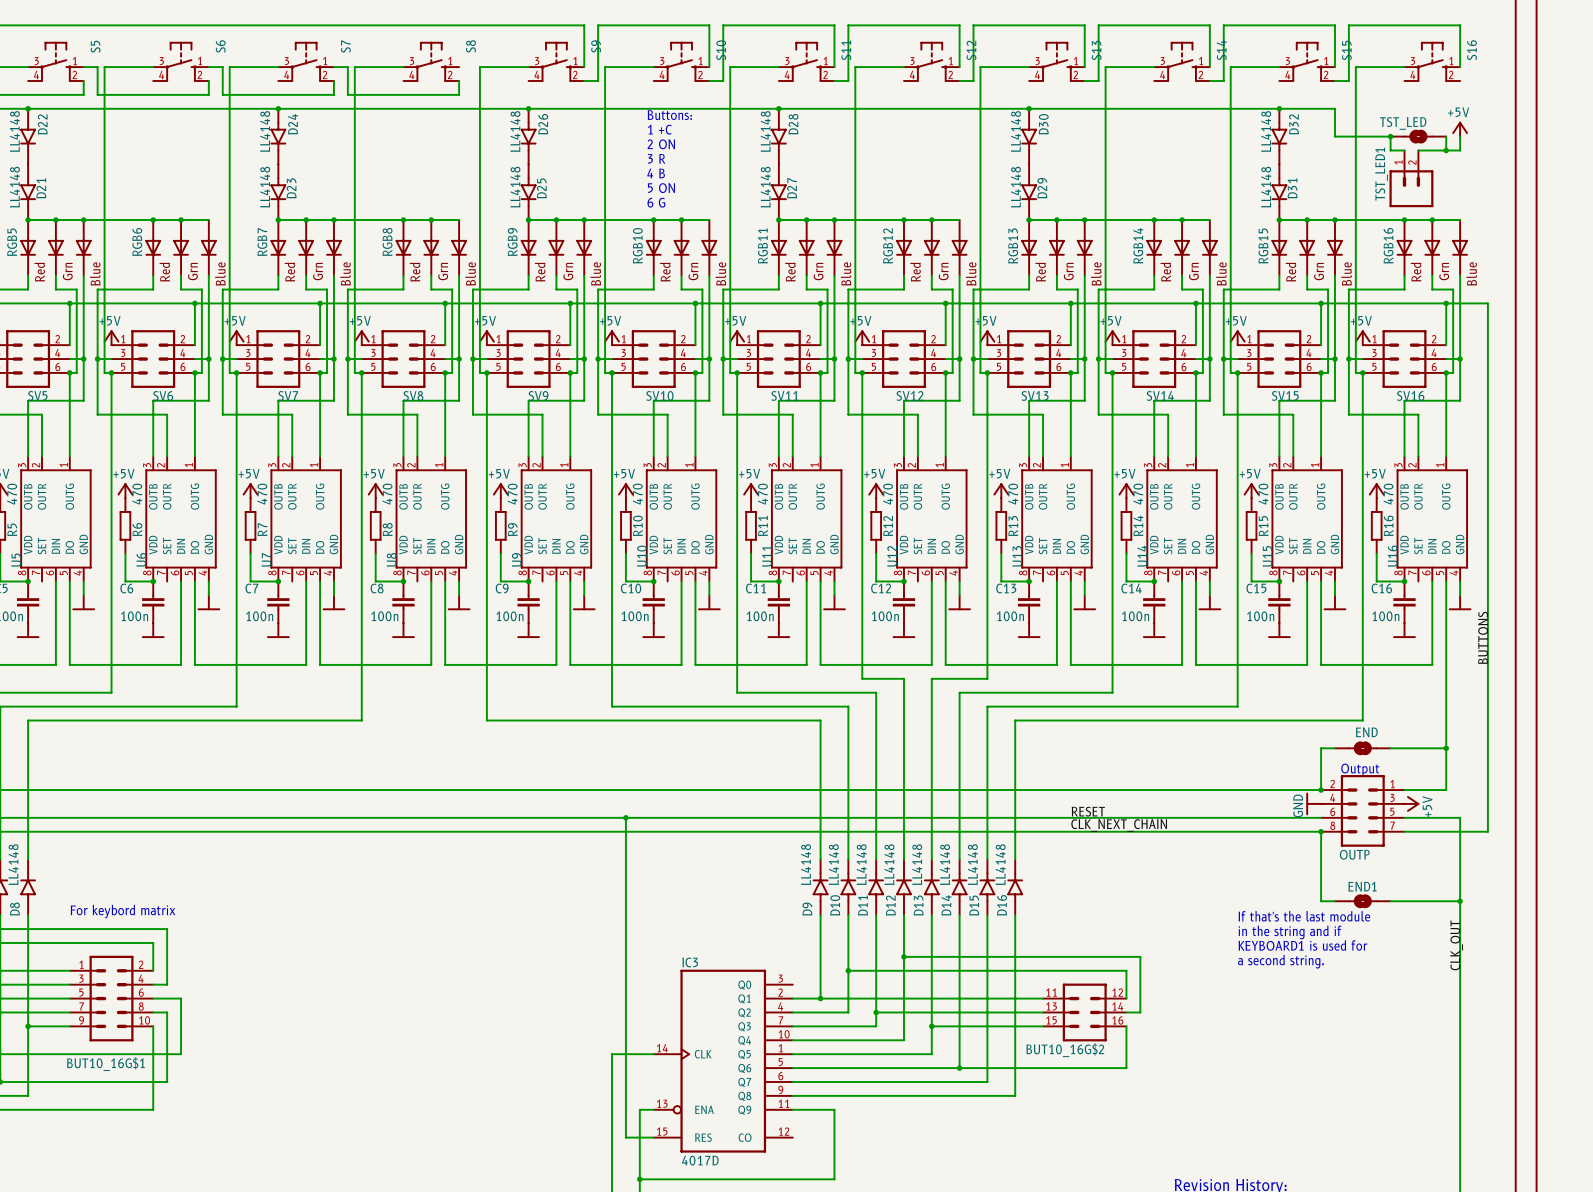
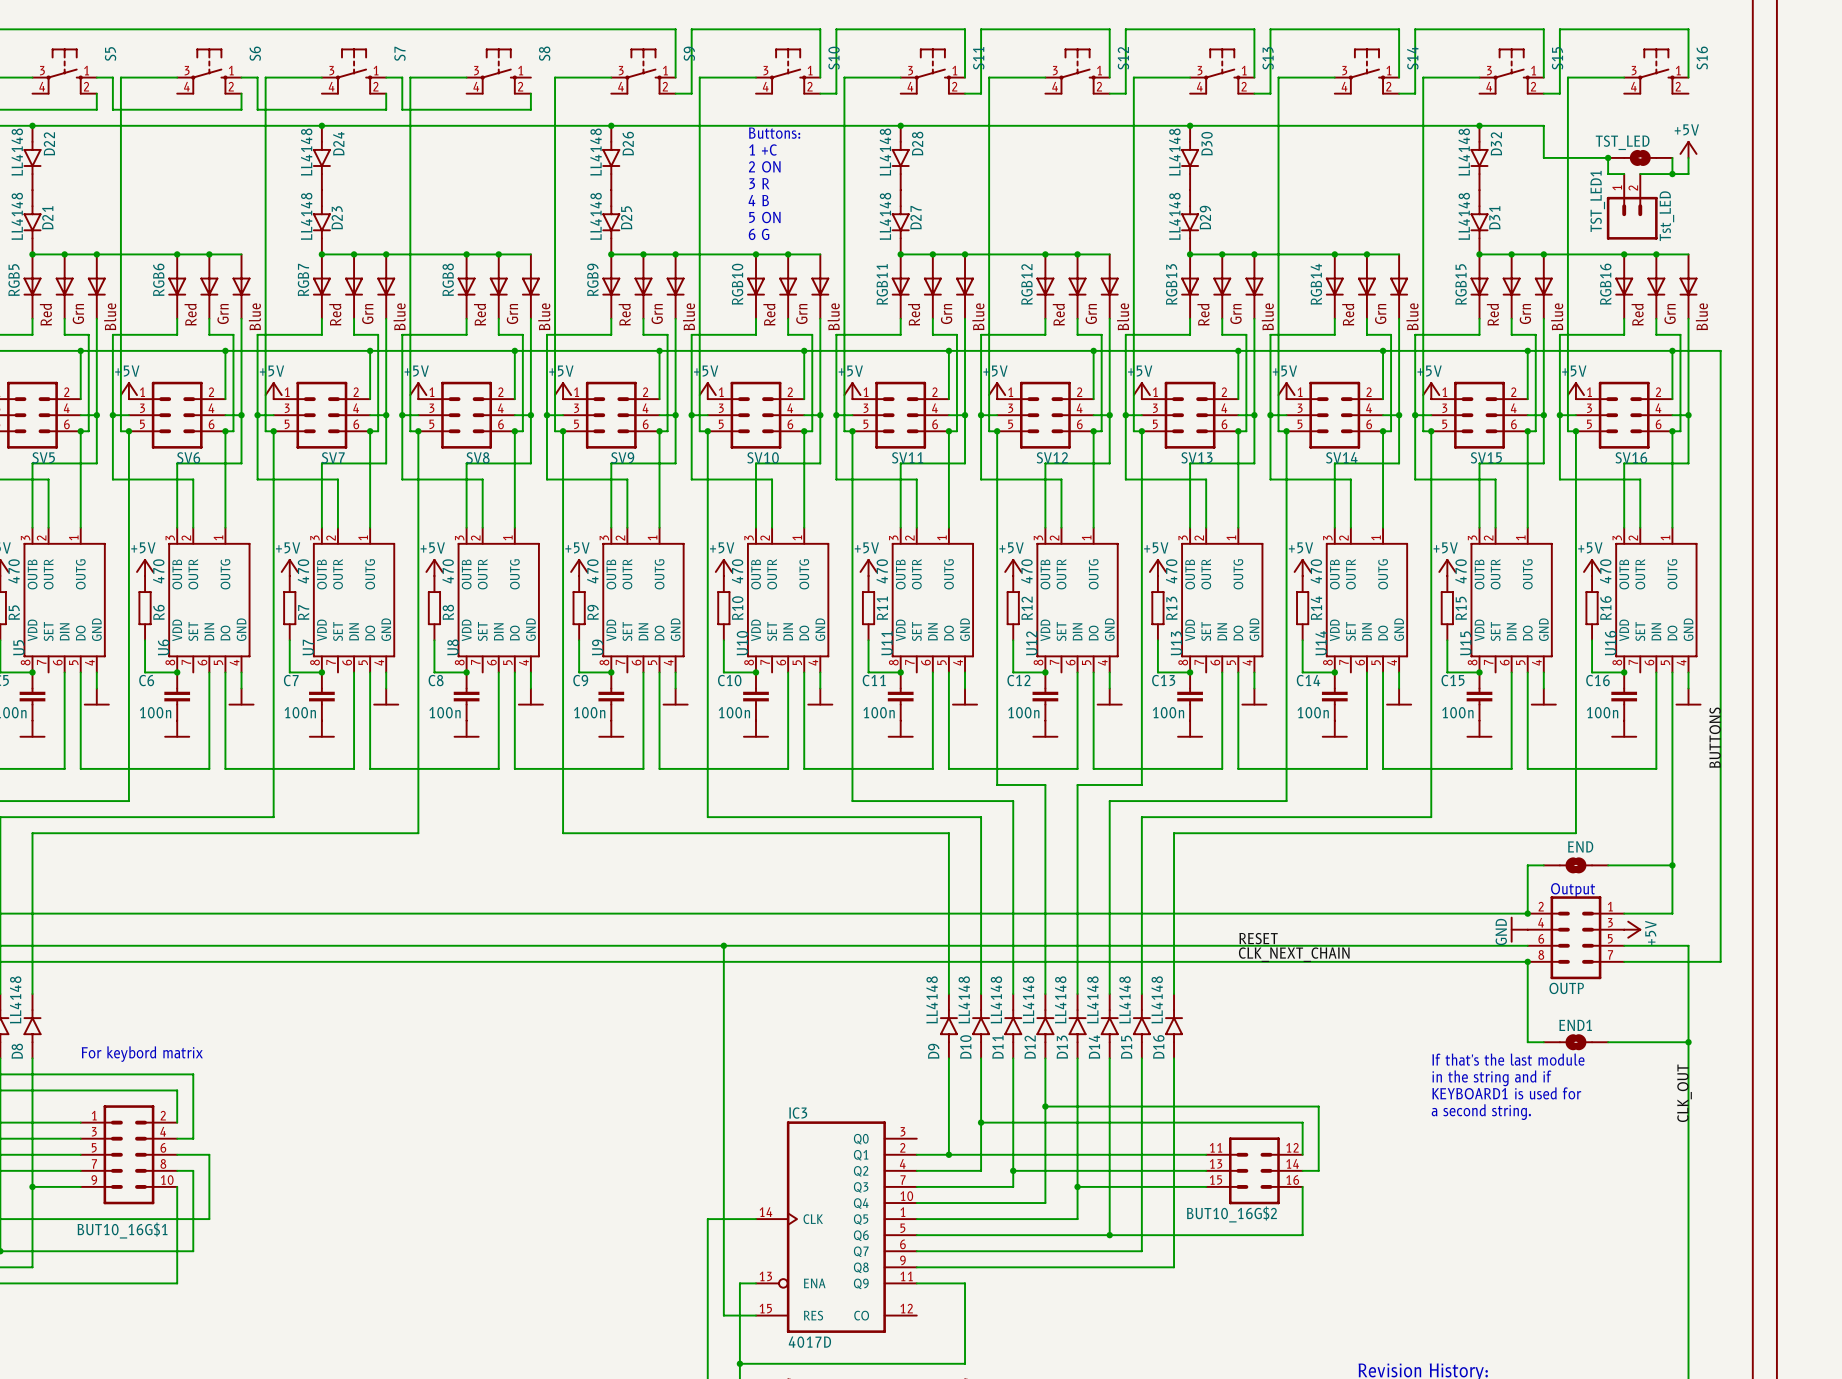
TST_LED1 value: none -> Tst_LED (1666, 216)

